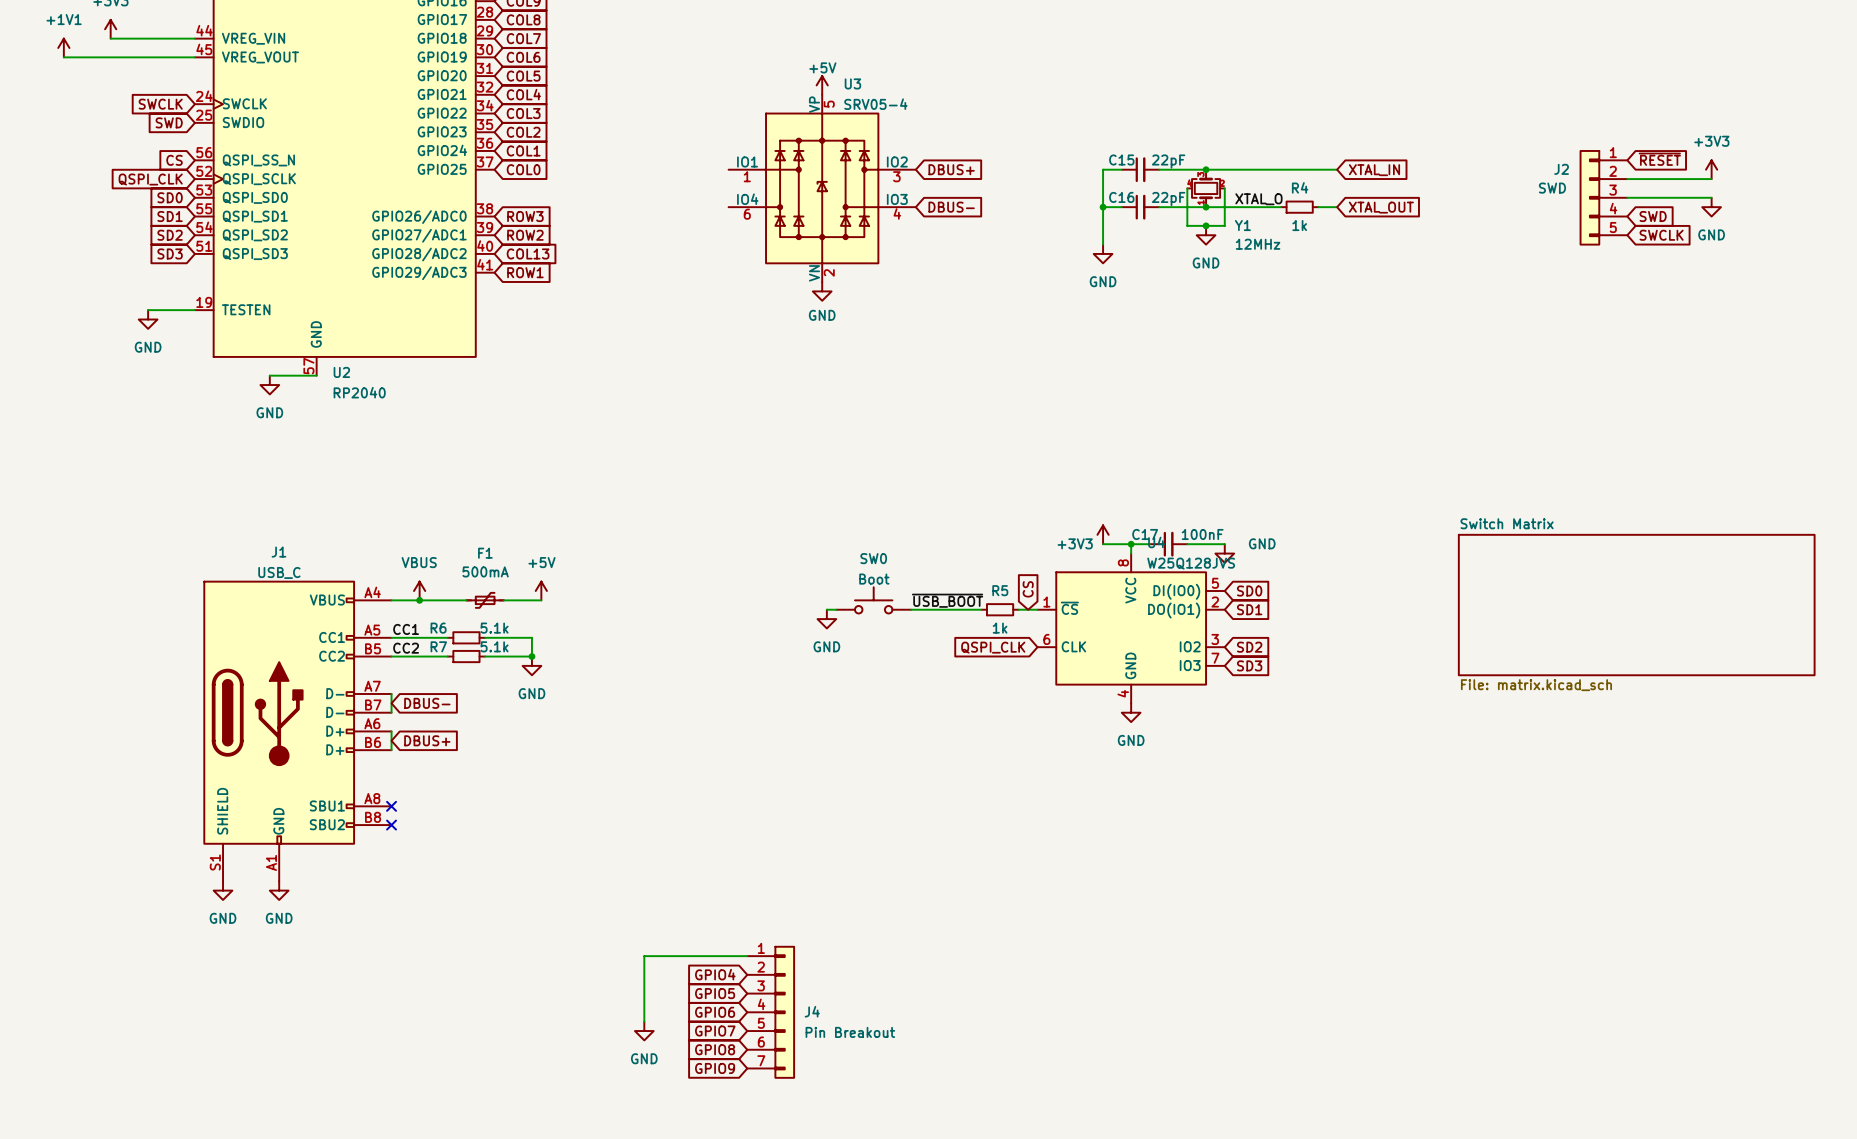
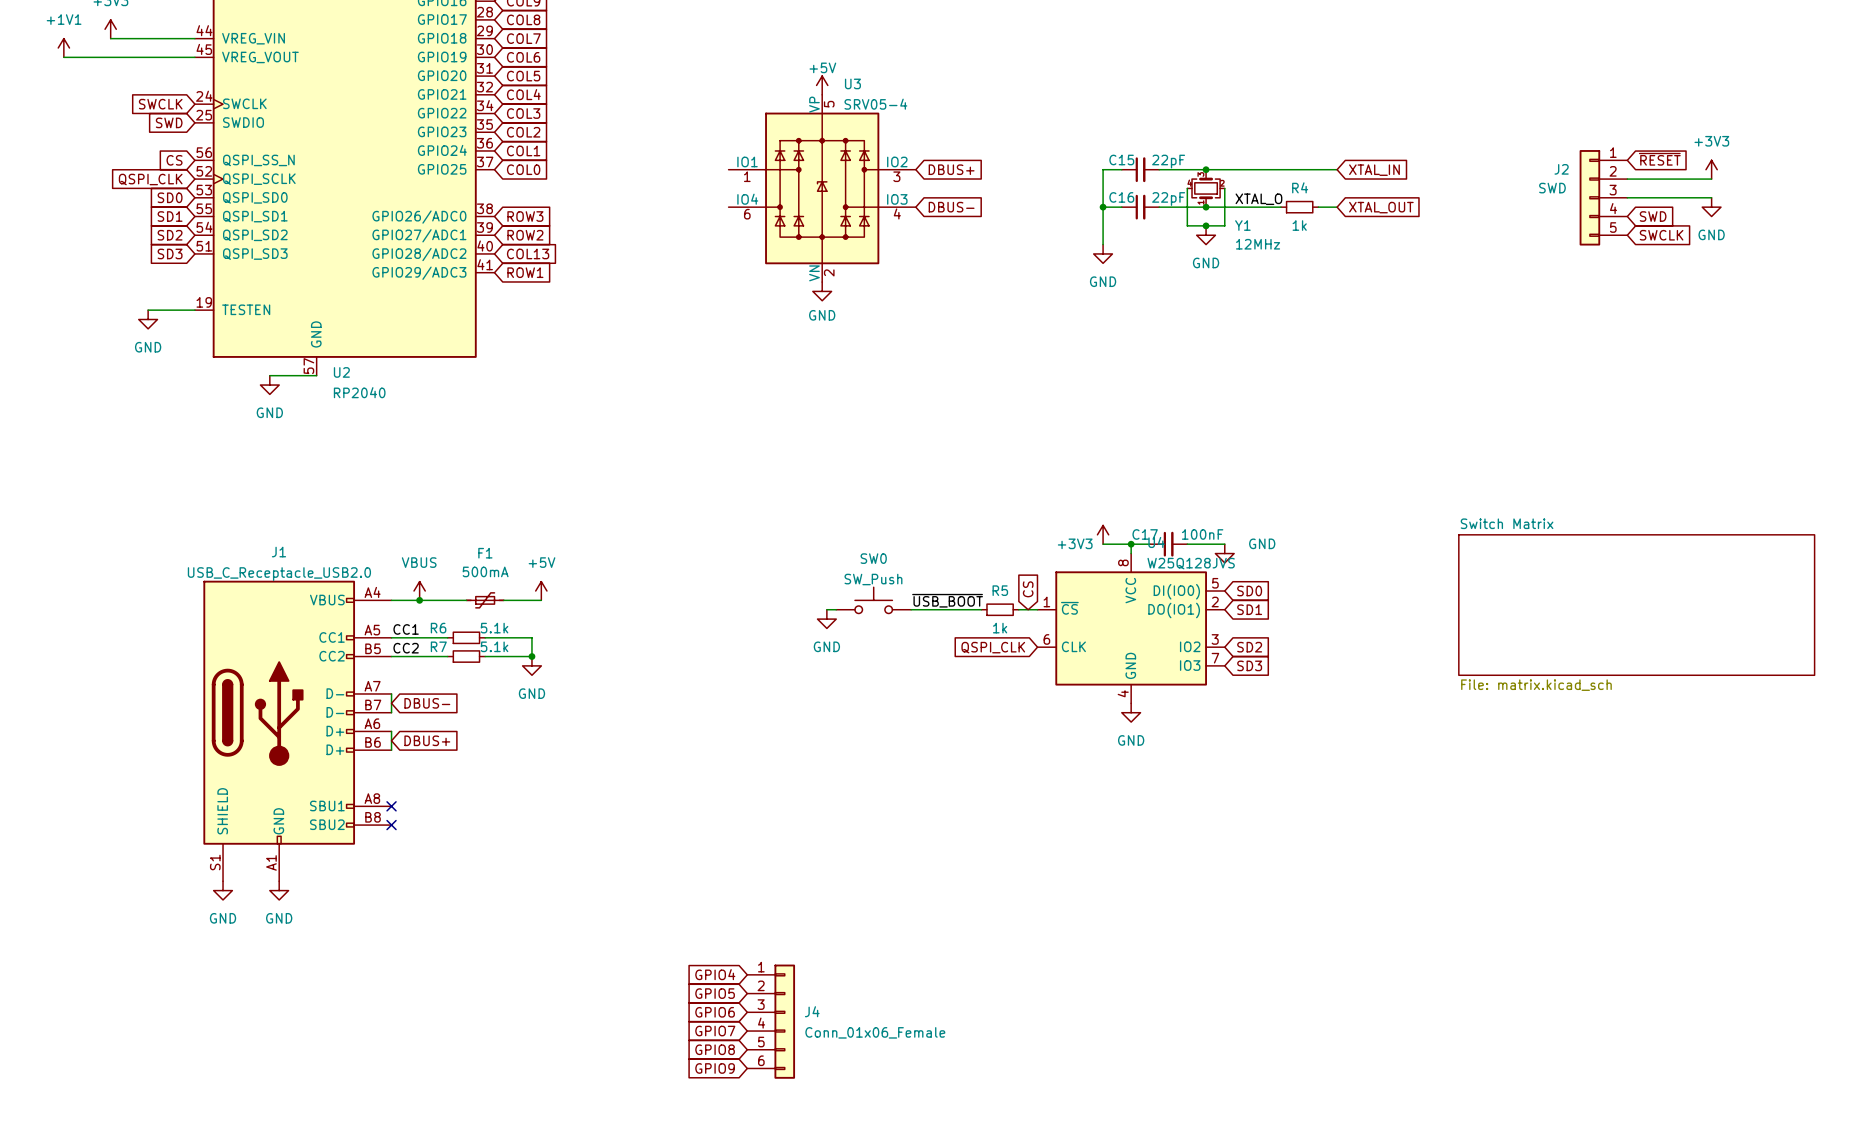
J1 value: USB_C (279, 572) -> USB_C_Receptacle_USB2.0 (279, 574)
SW0 value: Boot (874, 579) -> SW_Push (873, 579)
J4 symbol: [747, 945, 796, 1079] -> [747, 964, 796, 1079]
wire: (747, 956) (644, 956) (644, 1021) -> none
power symbol: GND (644, 1031) -> none
J4 value: Pin Breakout (850, 1032) -> Conn_01x06_Female (875, 1032)

